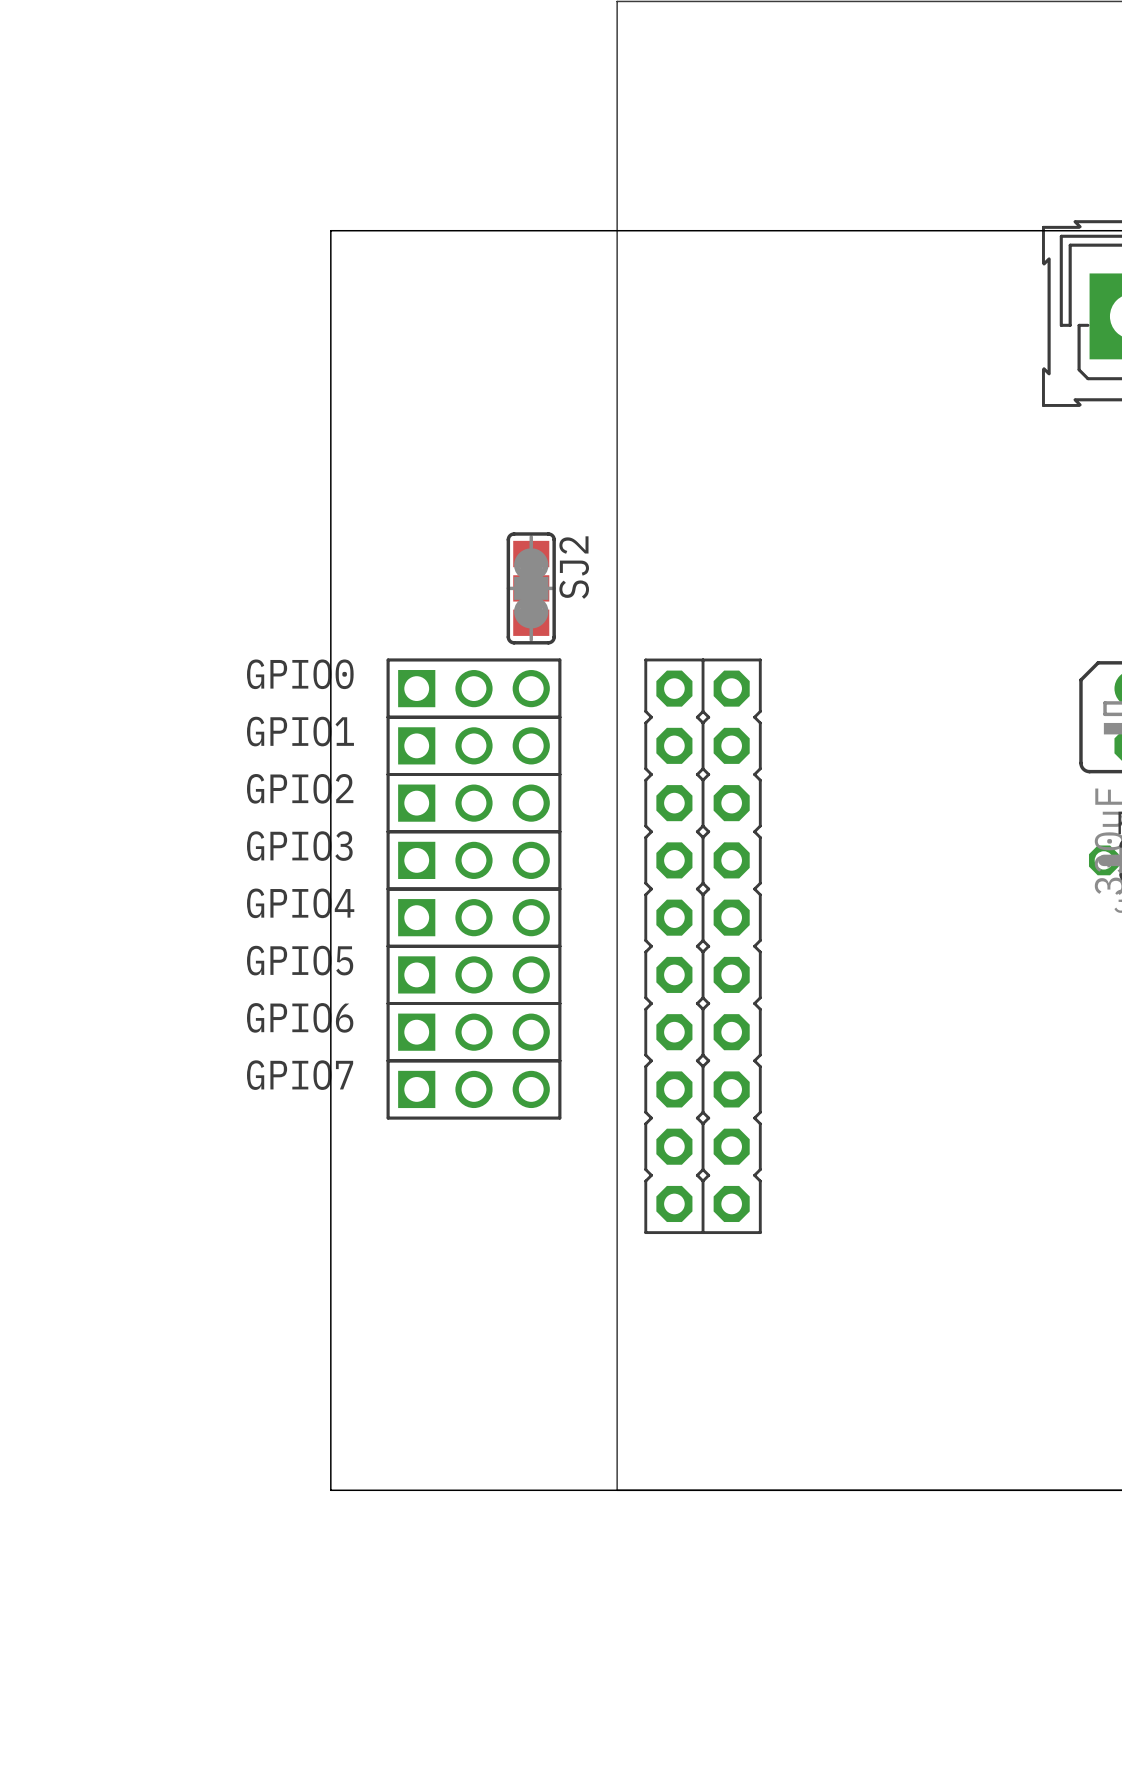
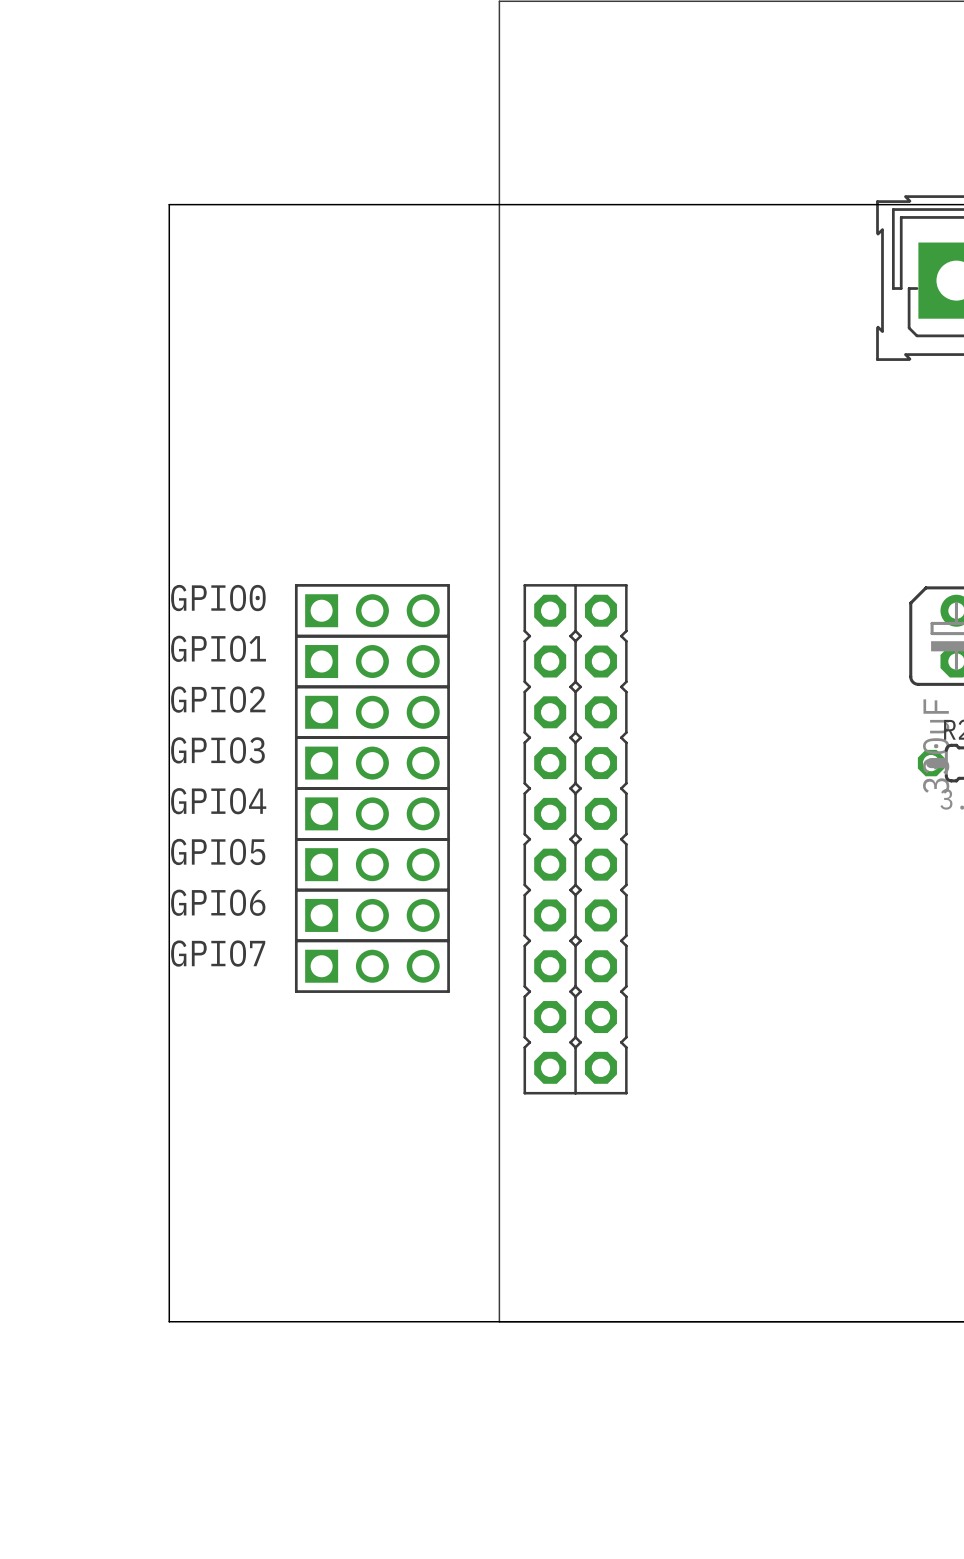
board edge: (330, 230) (330, 1490) -> (245, 204) (169, 204) (169, 1321) (245, 1321)
SJ2: (531, 588) -> none

